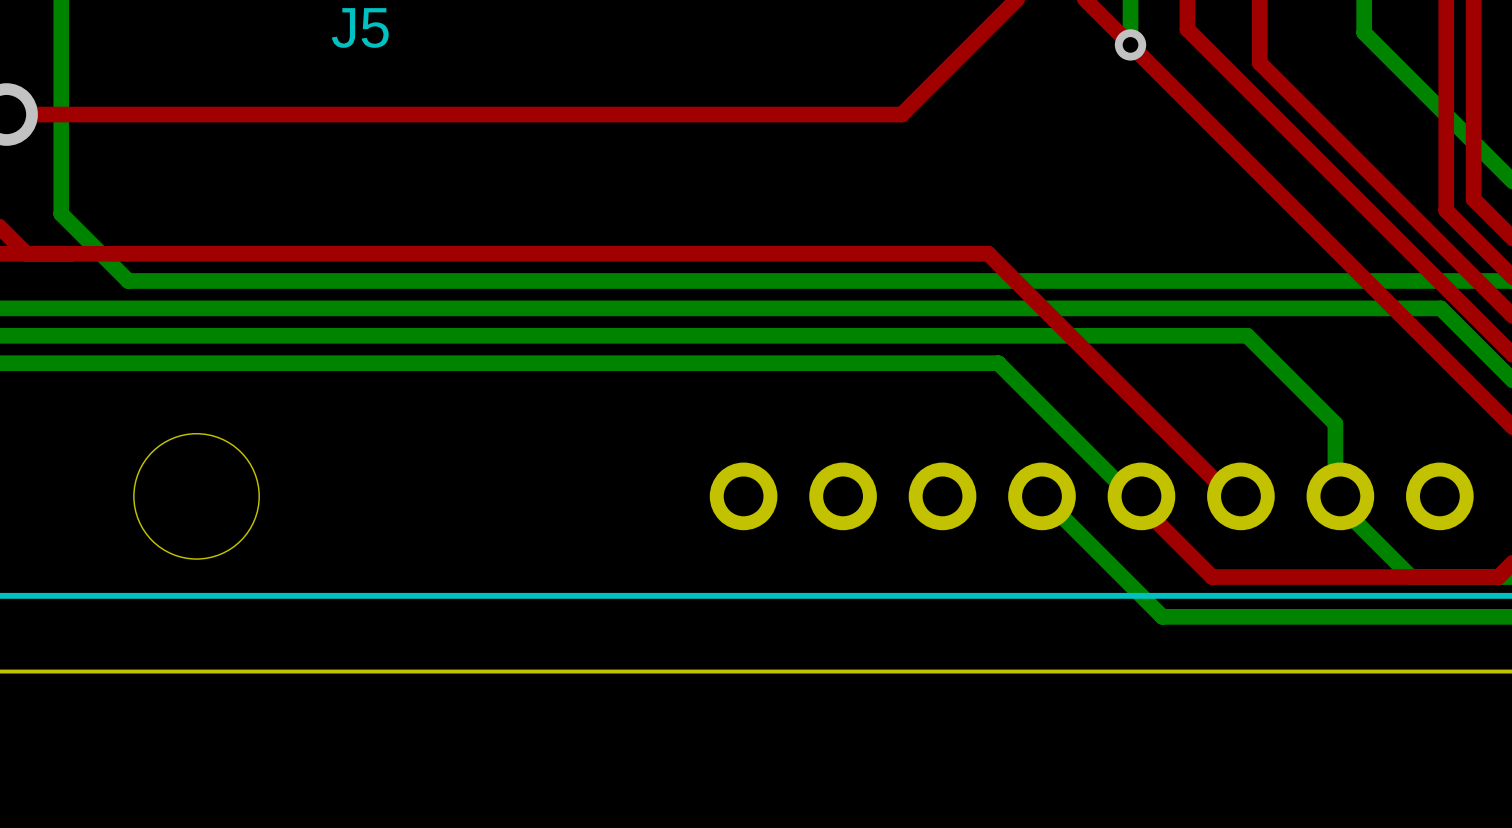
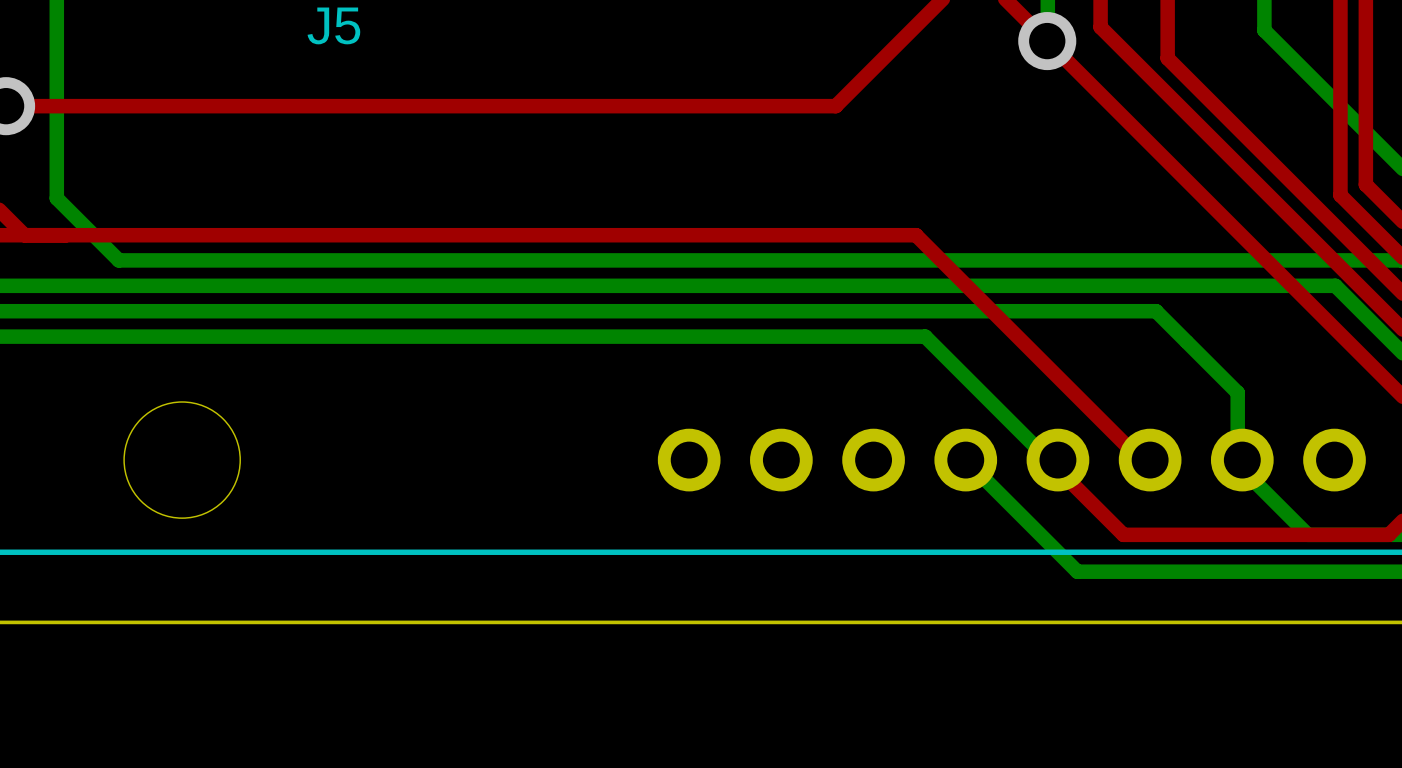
via size: [1114, 29, 1147, 61] -> [1018, 12, 1077, 71]

